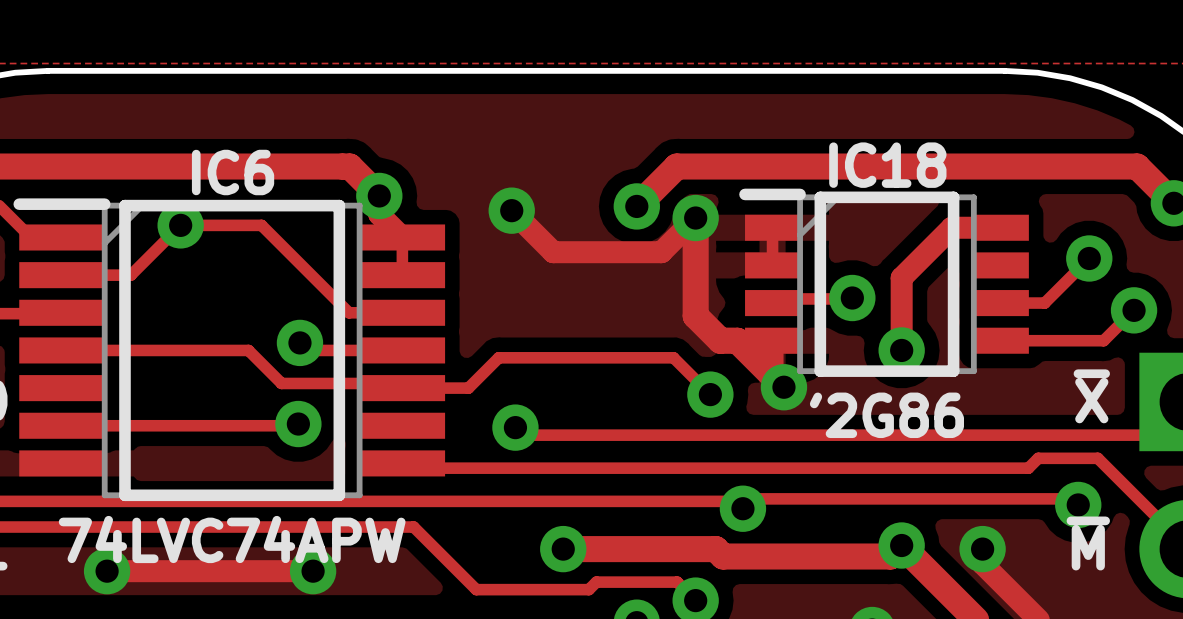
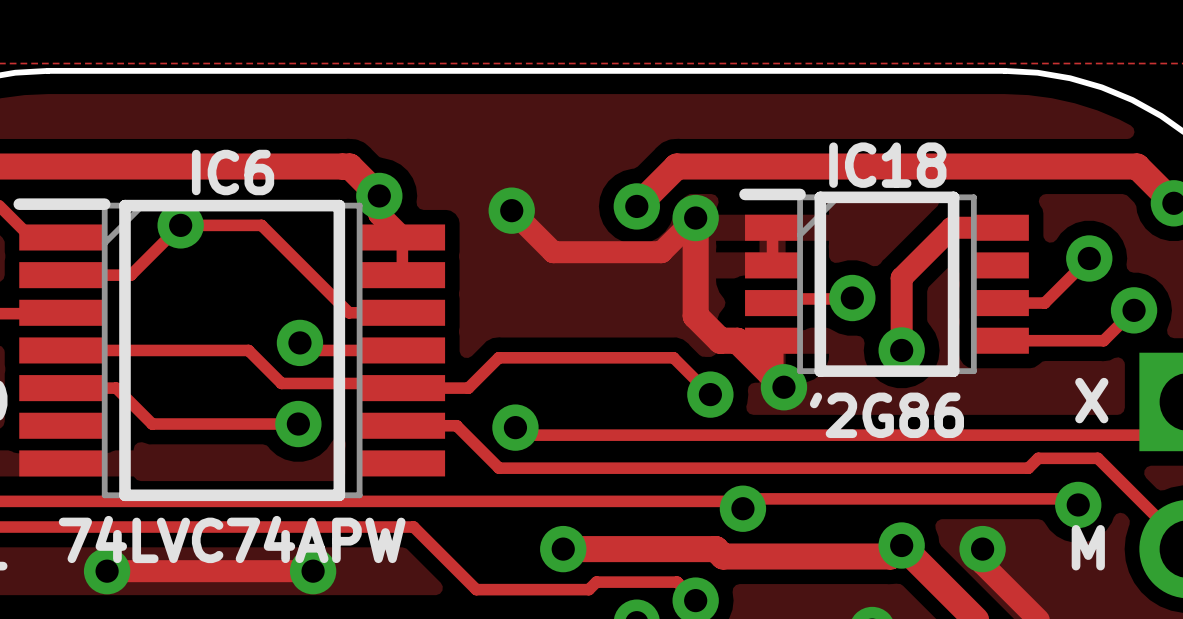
text: ~{X} (1091, 396) -> X (1091, 400)
track: (298, 424) (296, 425) (61, 425) -> (298, 424) (152, 424) (116, 388) (61, 388)
track: (407, 468) (499, 468) -> (402, 425) (456, 425) (499, 468)
text: ~{M} (1088, 543) -> M (1088, 547)

